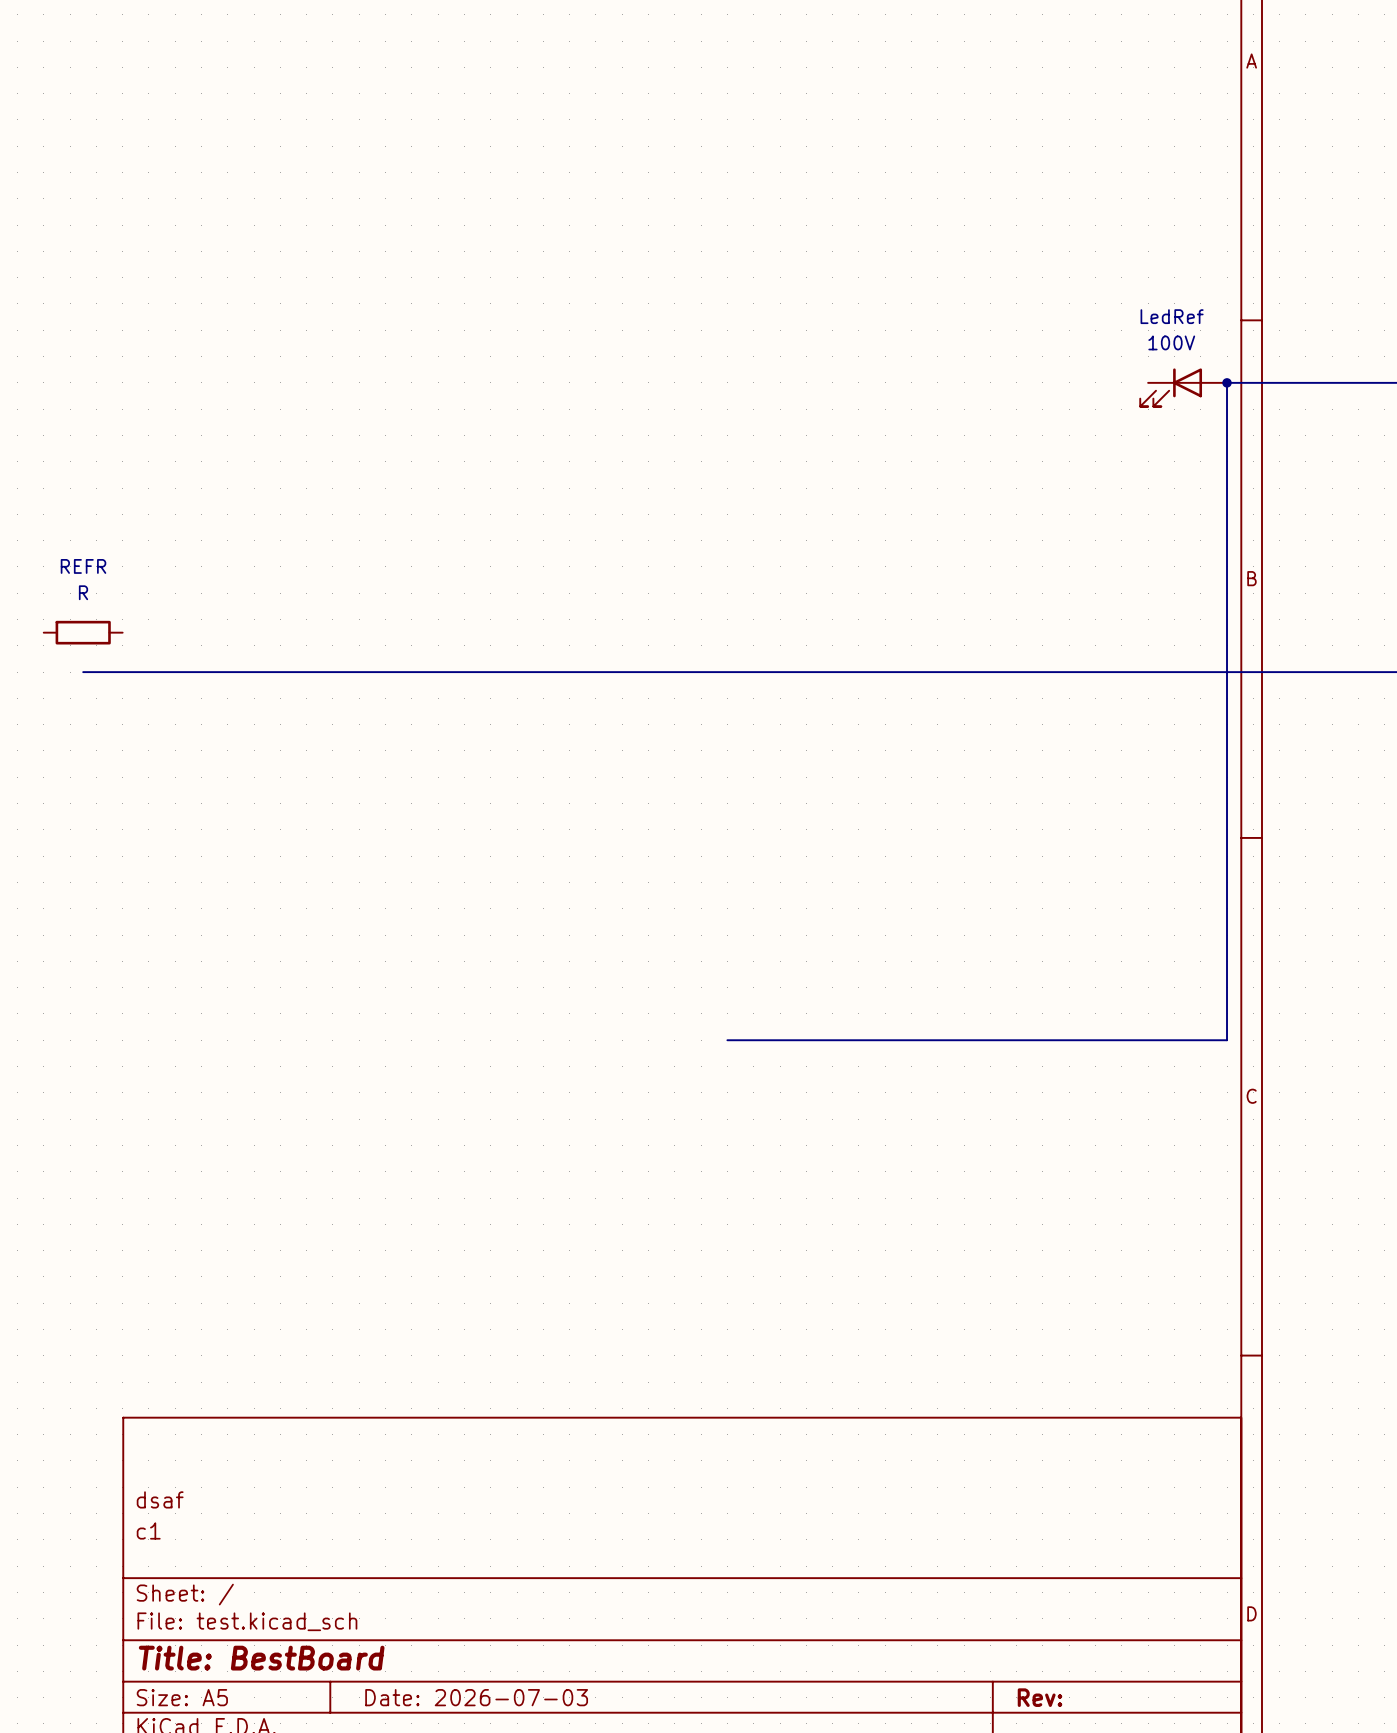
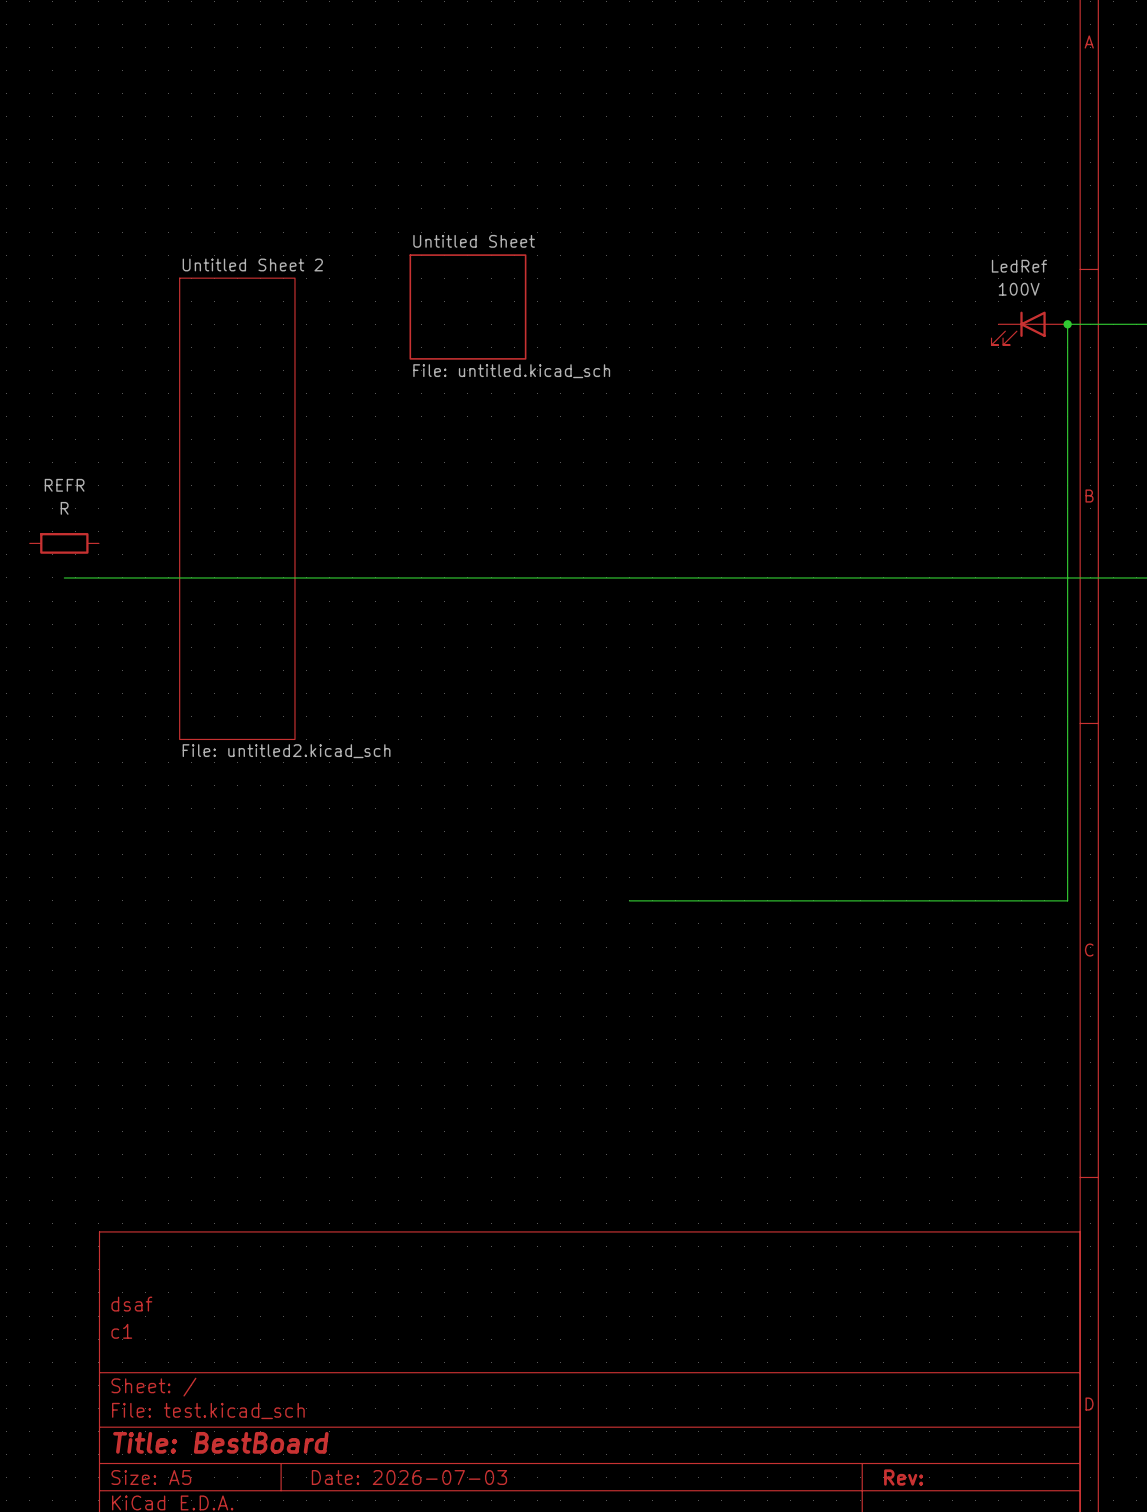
sheet Untitled Sheet: none -> File: untitled.kicad_sch (467, 306)
sheet Untitled Sheet 2: none -> File: untitled2.kicad_sch (237, 508)

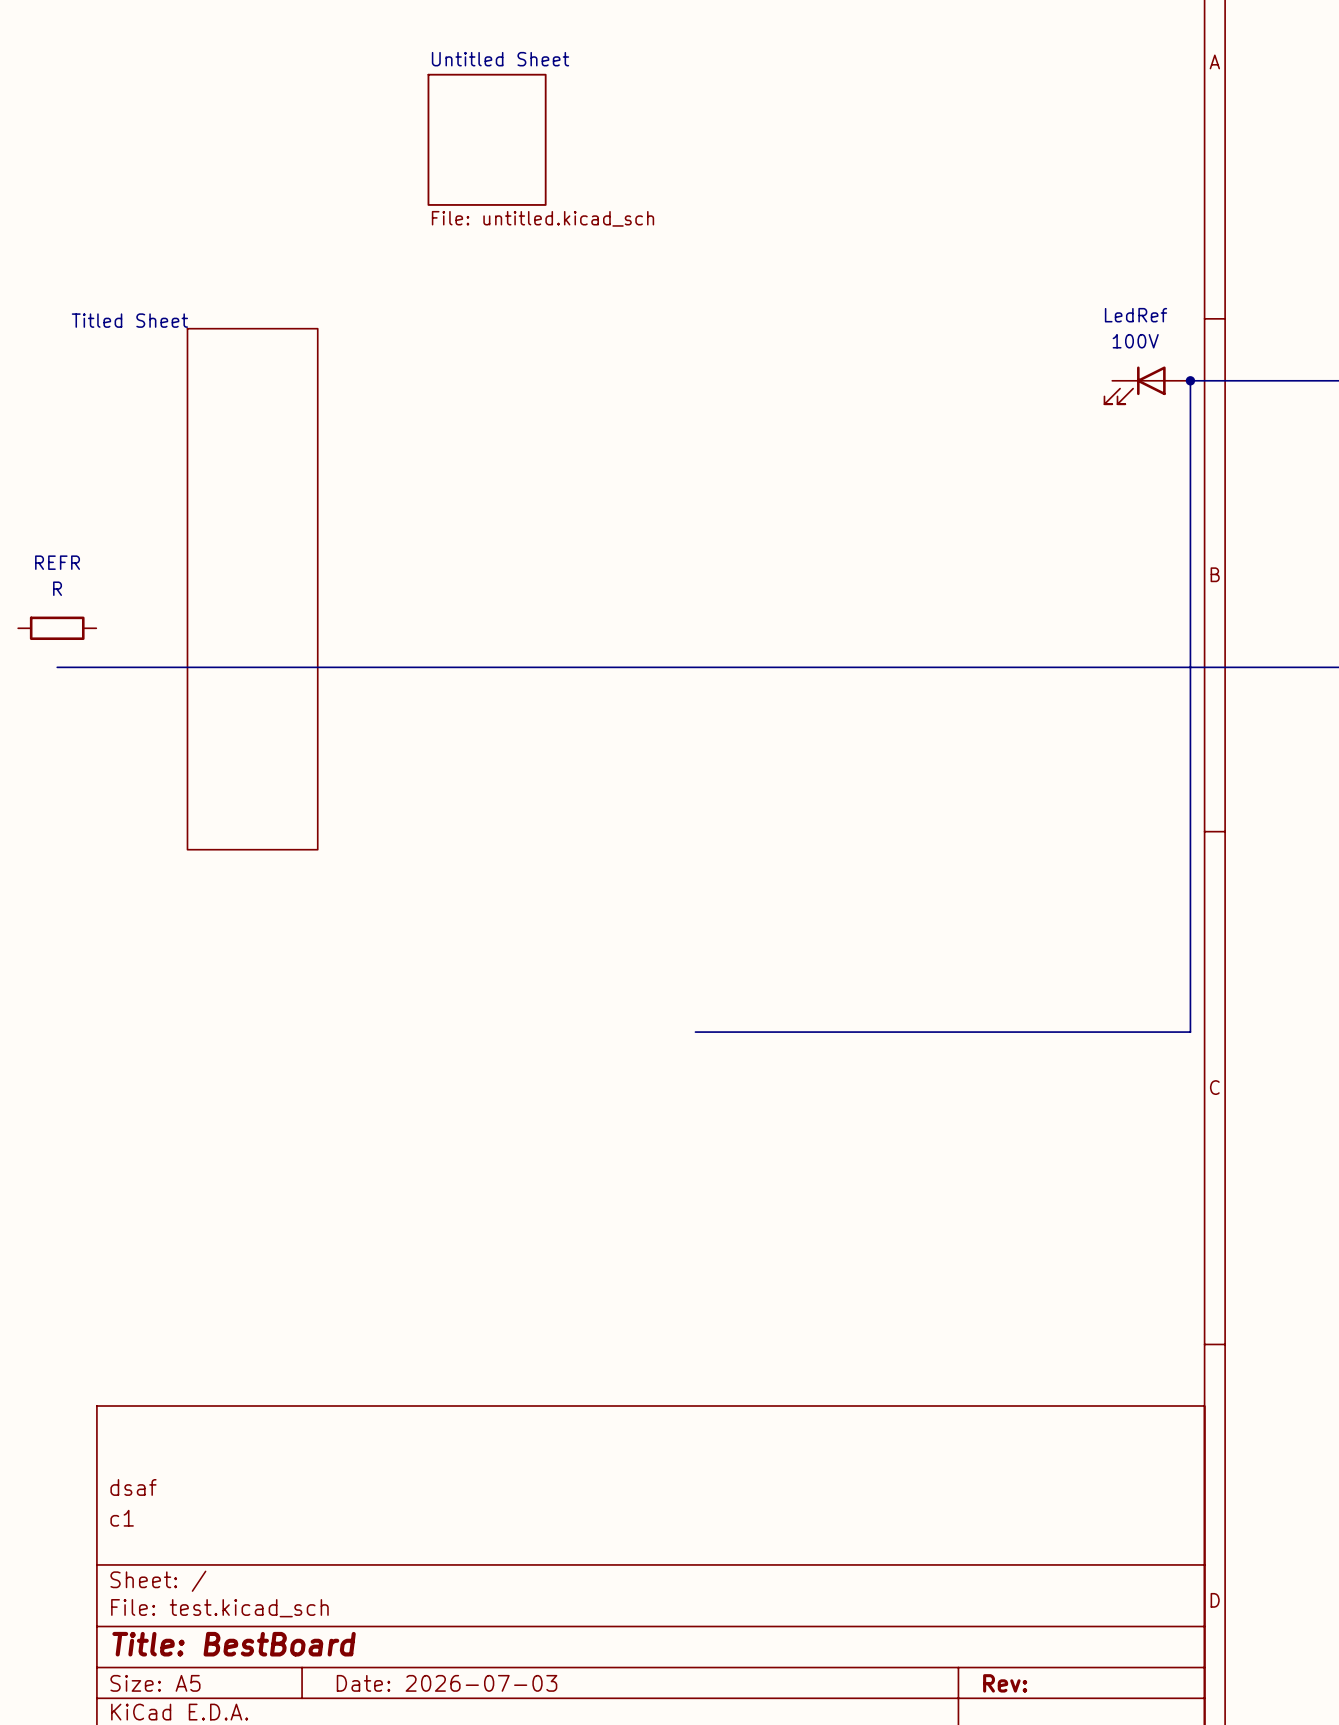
sheet Untitled Sheet 2 name: Untitled Sheet 2 (252, 264) -> Titled Sheet (129, 320)
sheet Untitled Sheet rotation: 0° (467, 306) -> 90° clockwise (487, 139)
sheet Untitled Sheet position: (467, 306) -> (487, 139)
sheet Untitled Sheet 2 value: File: untitled2.kicad_sch (286, 751) -> none

